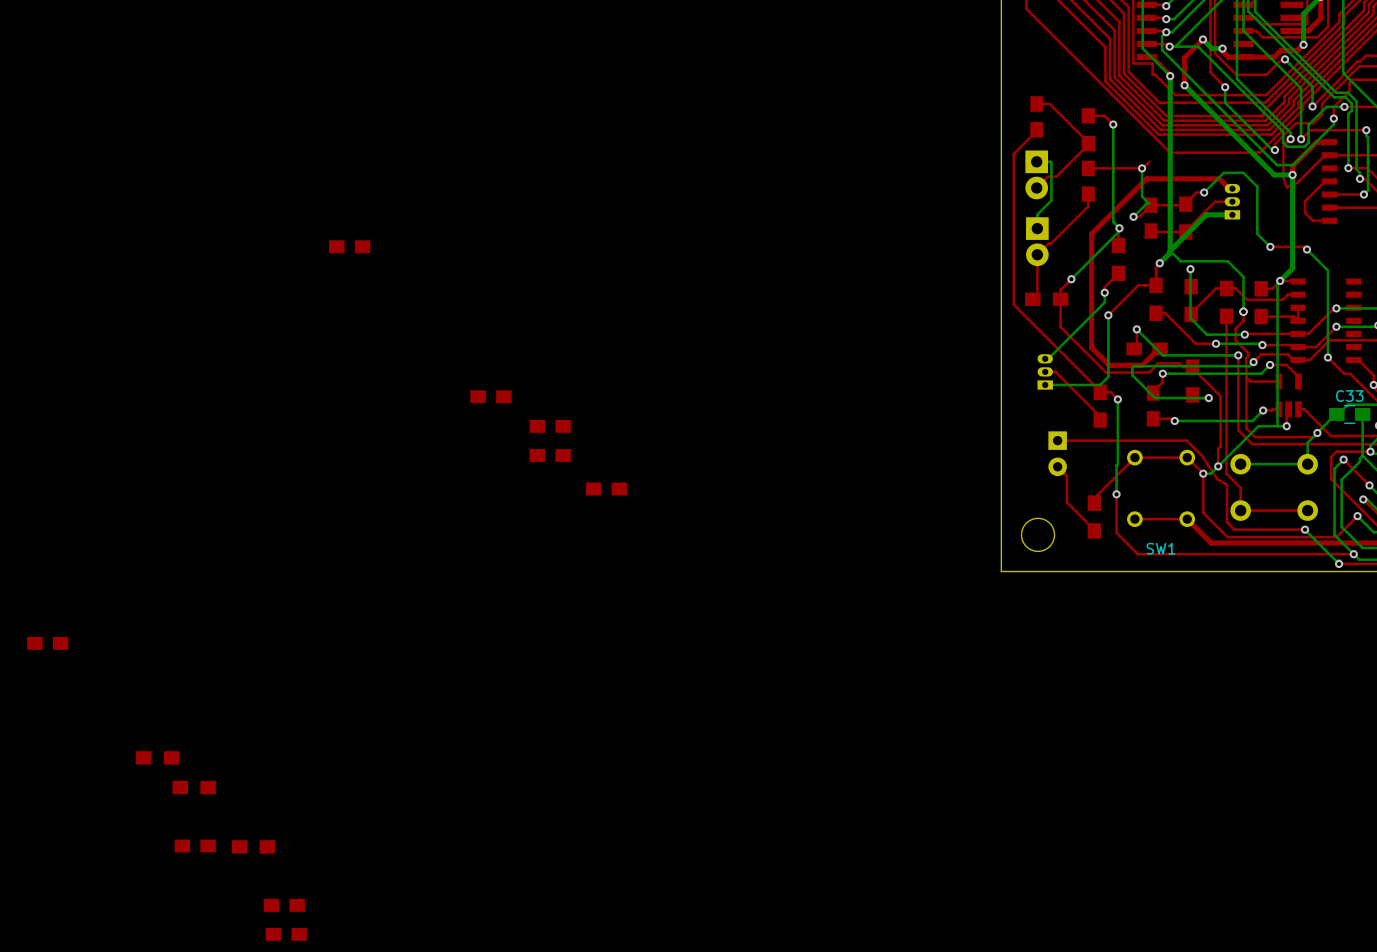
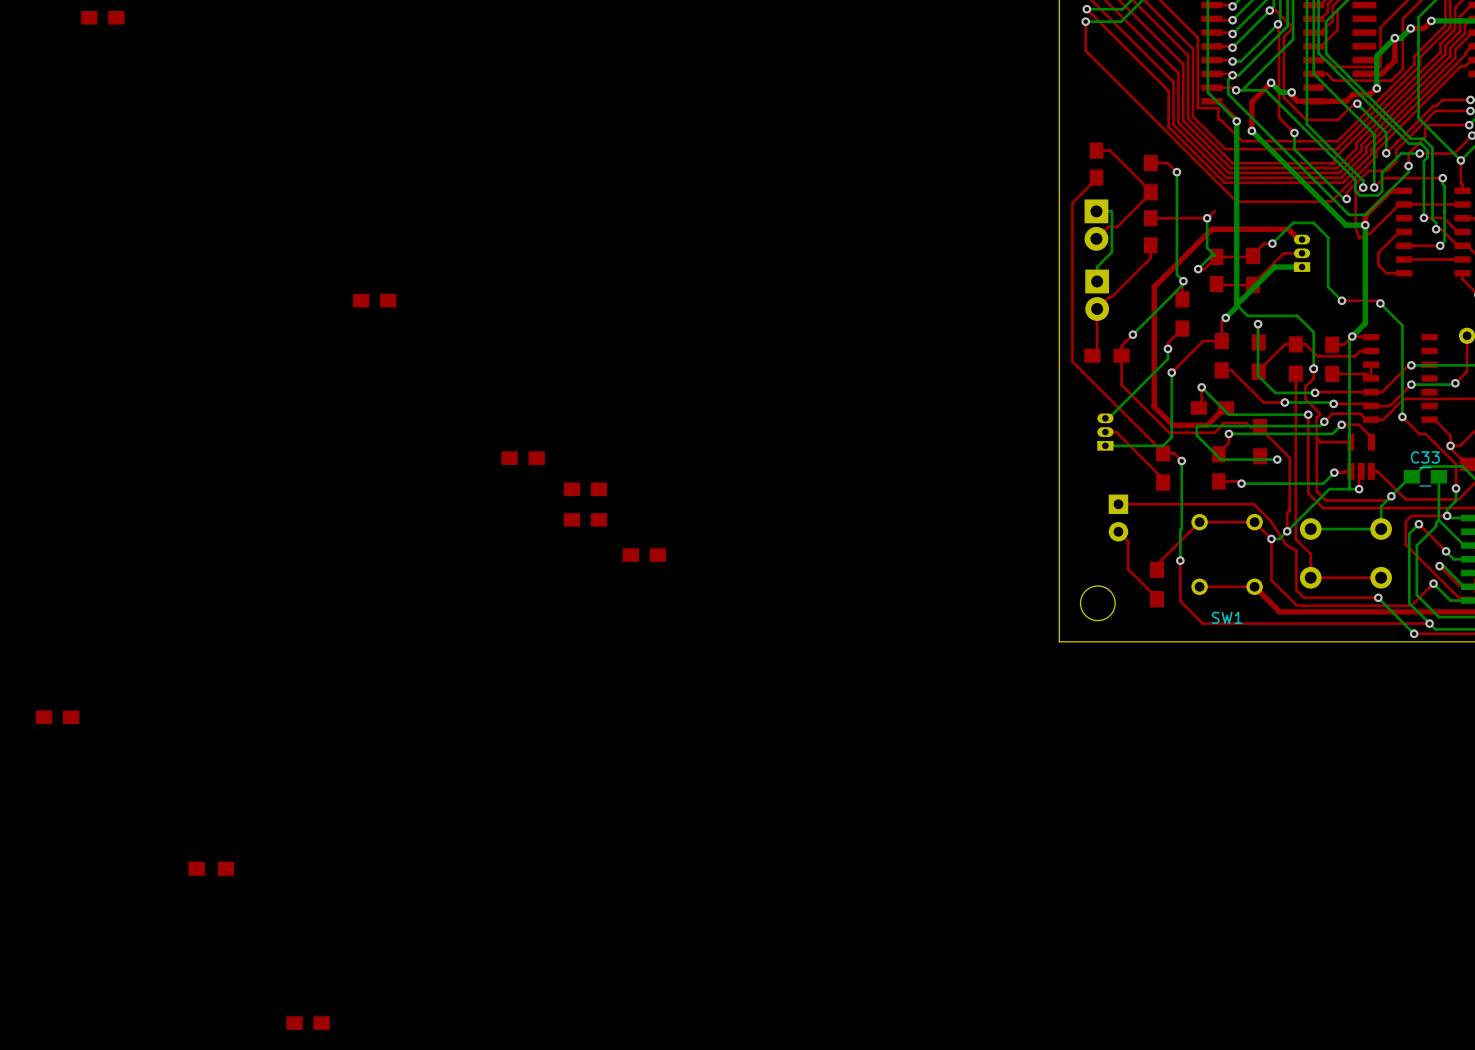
part: (157, 757) -> none
part: (195, 846) -> none
part: (253, 846) -> none
part: (284, 905) -> none

